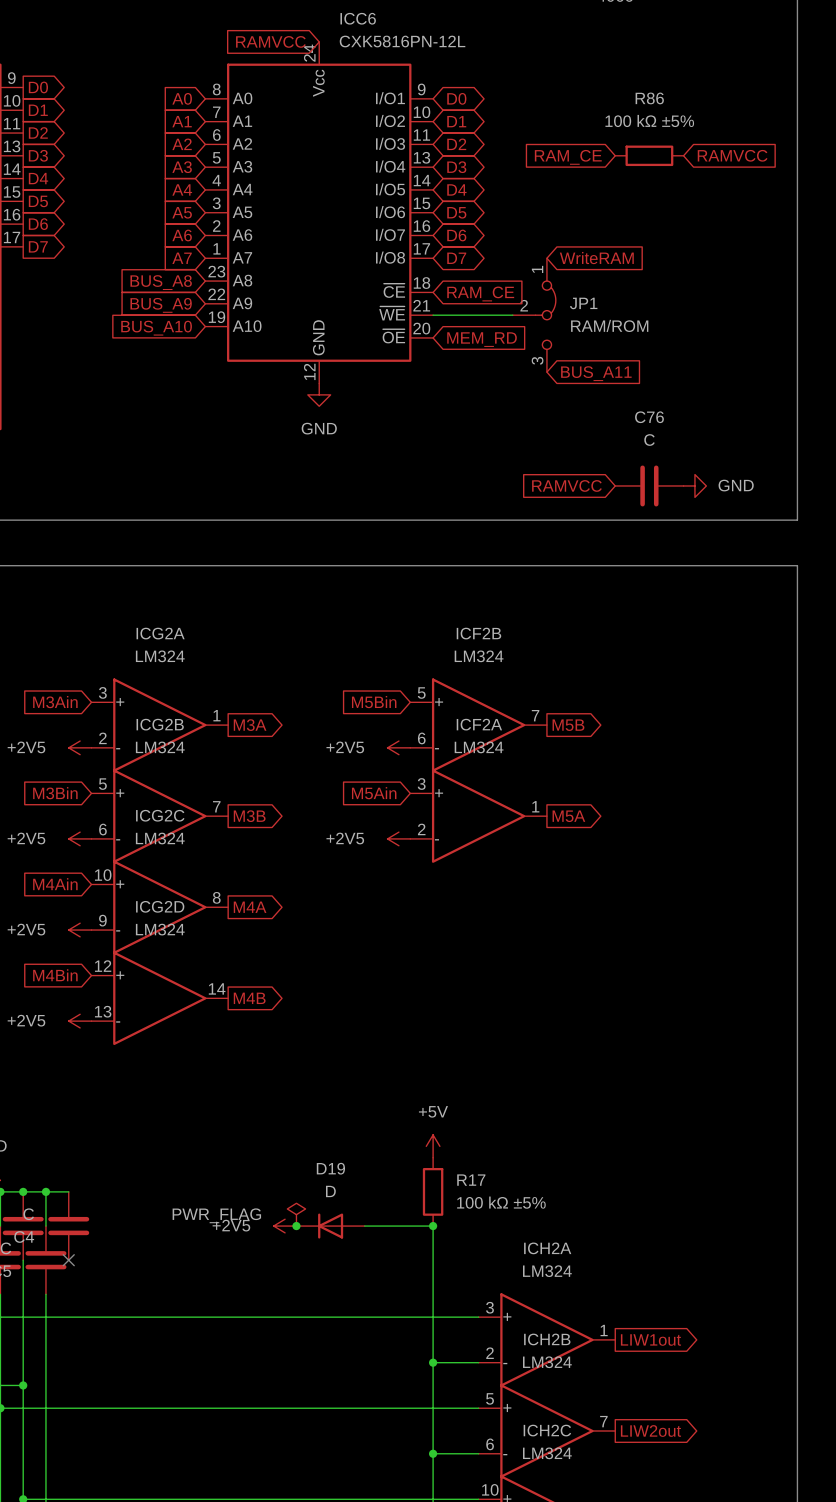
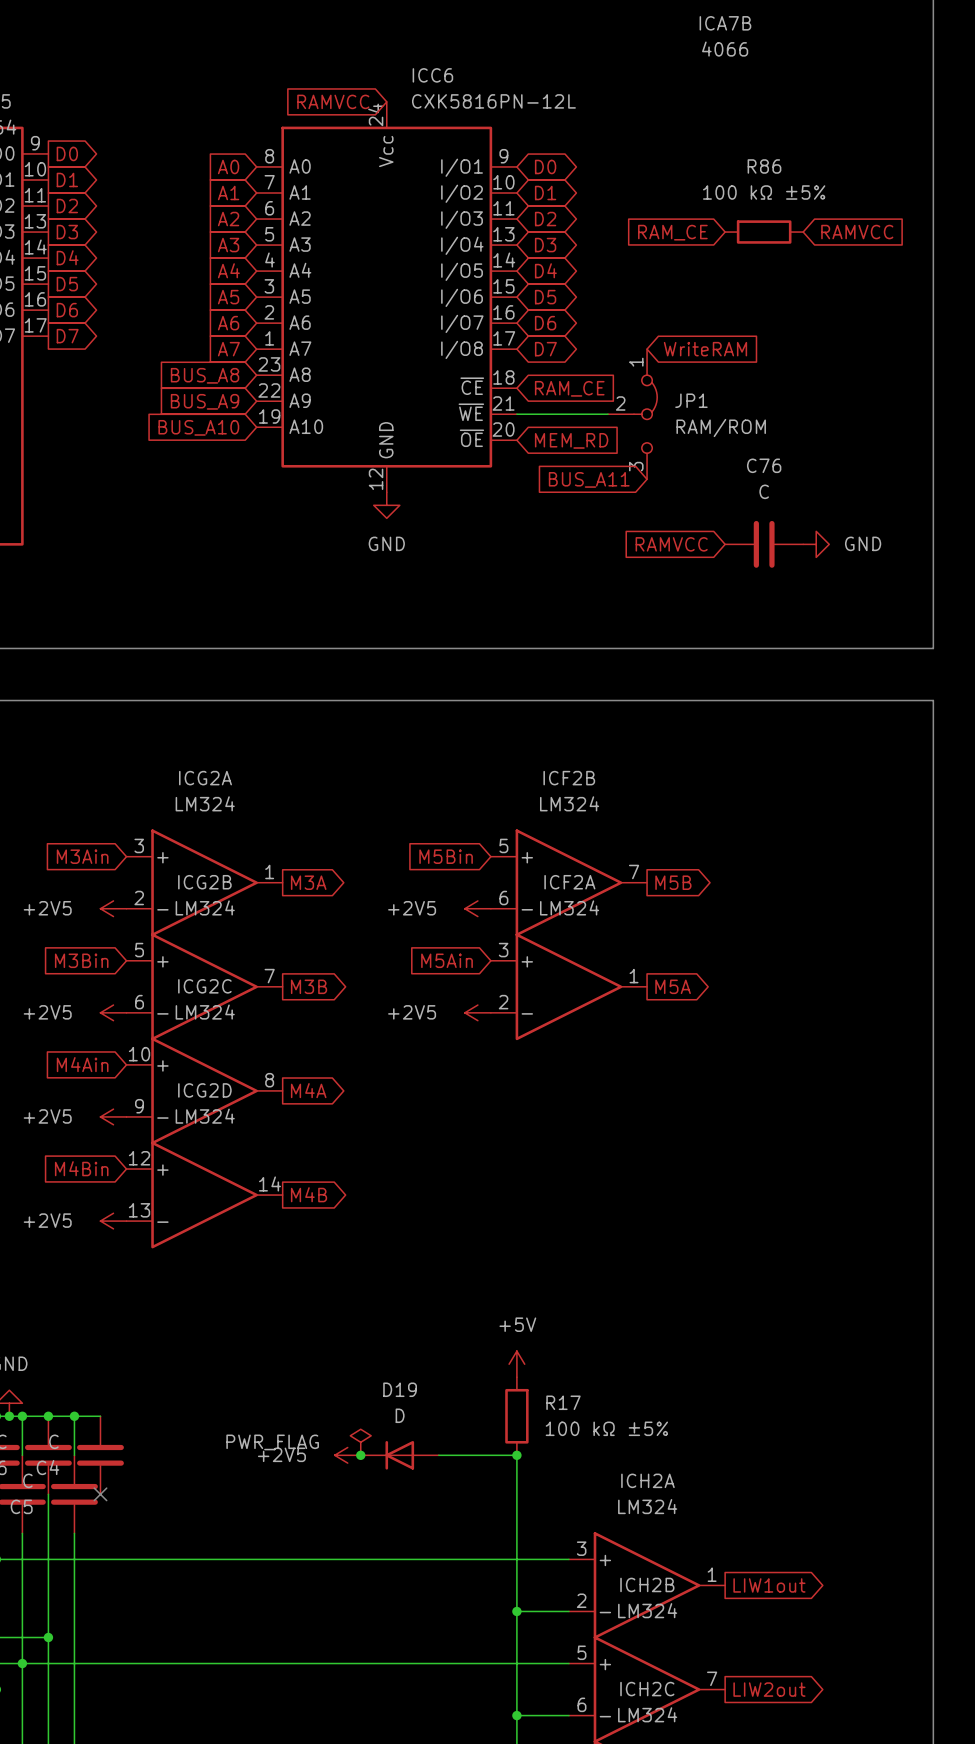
global label rotation: 0° (596, 373) -> 180° (589, 479)
global label position: RAMVCC (566, 485) -> RAMVCC (671, 544)
C76 position: (649, 485) -> (764, 544)
power symbol position: GND (694, 485) -> GND (816, 544)

